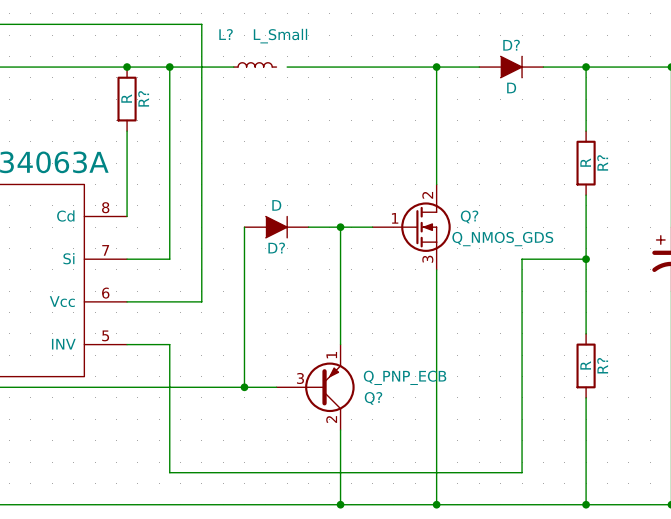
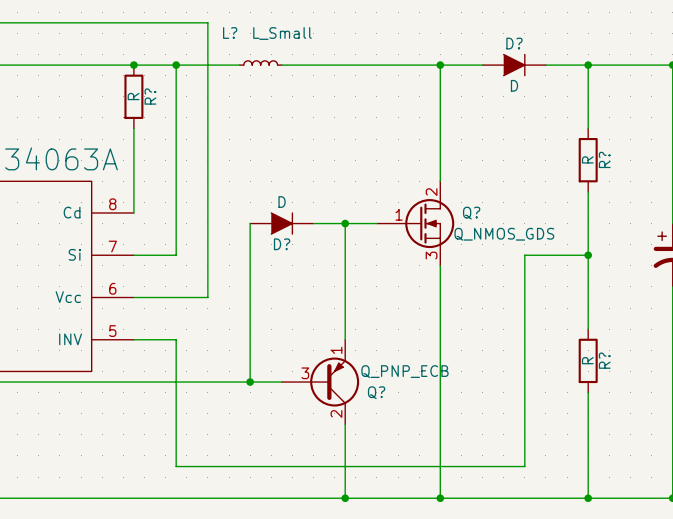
wire: none -> (281, 65) (292, 65)

